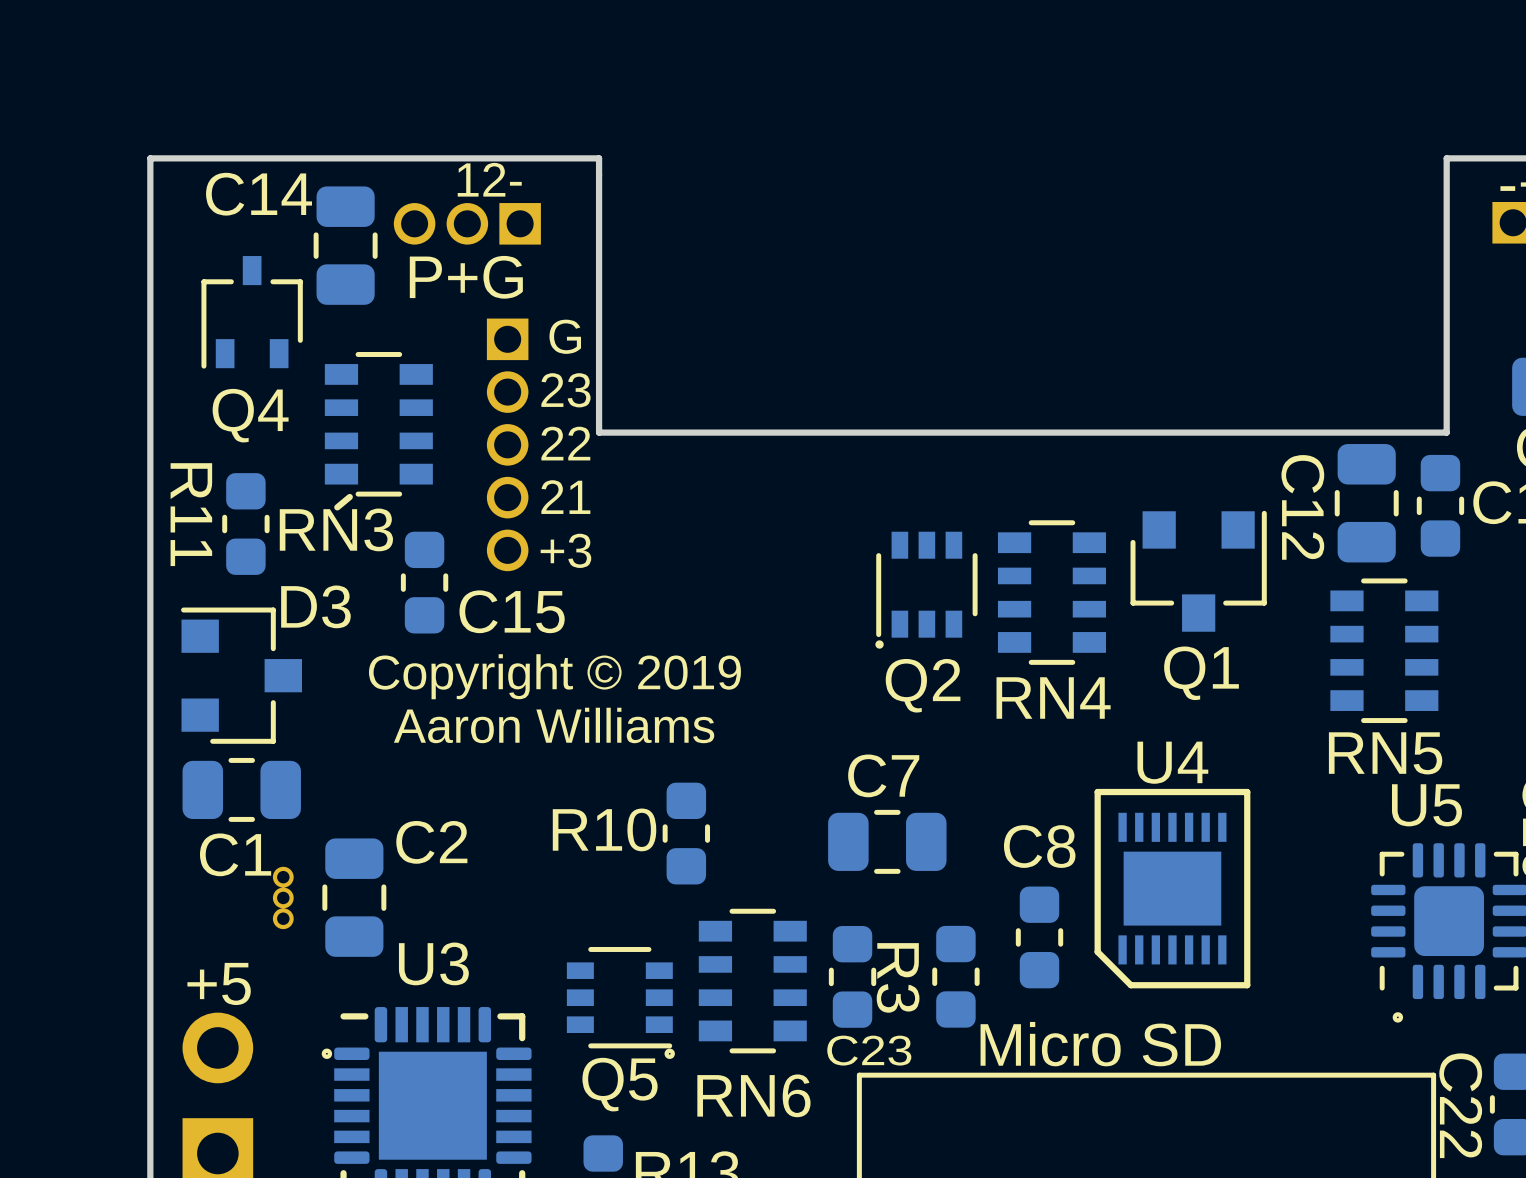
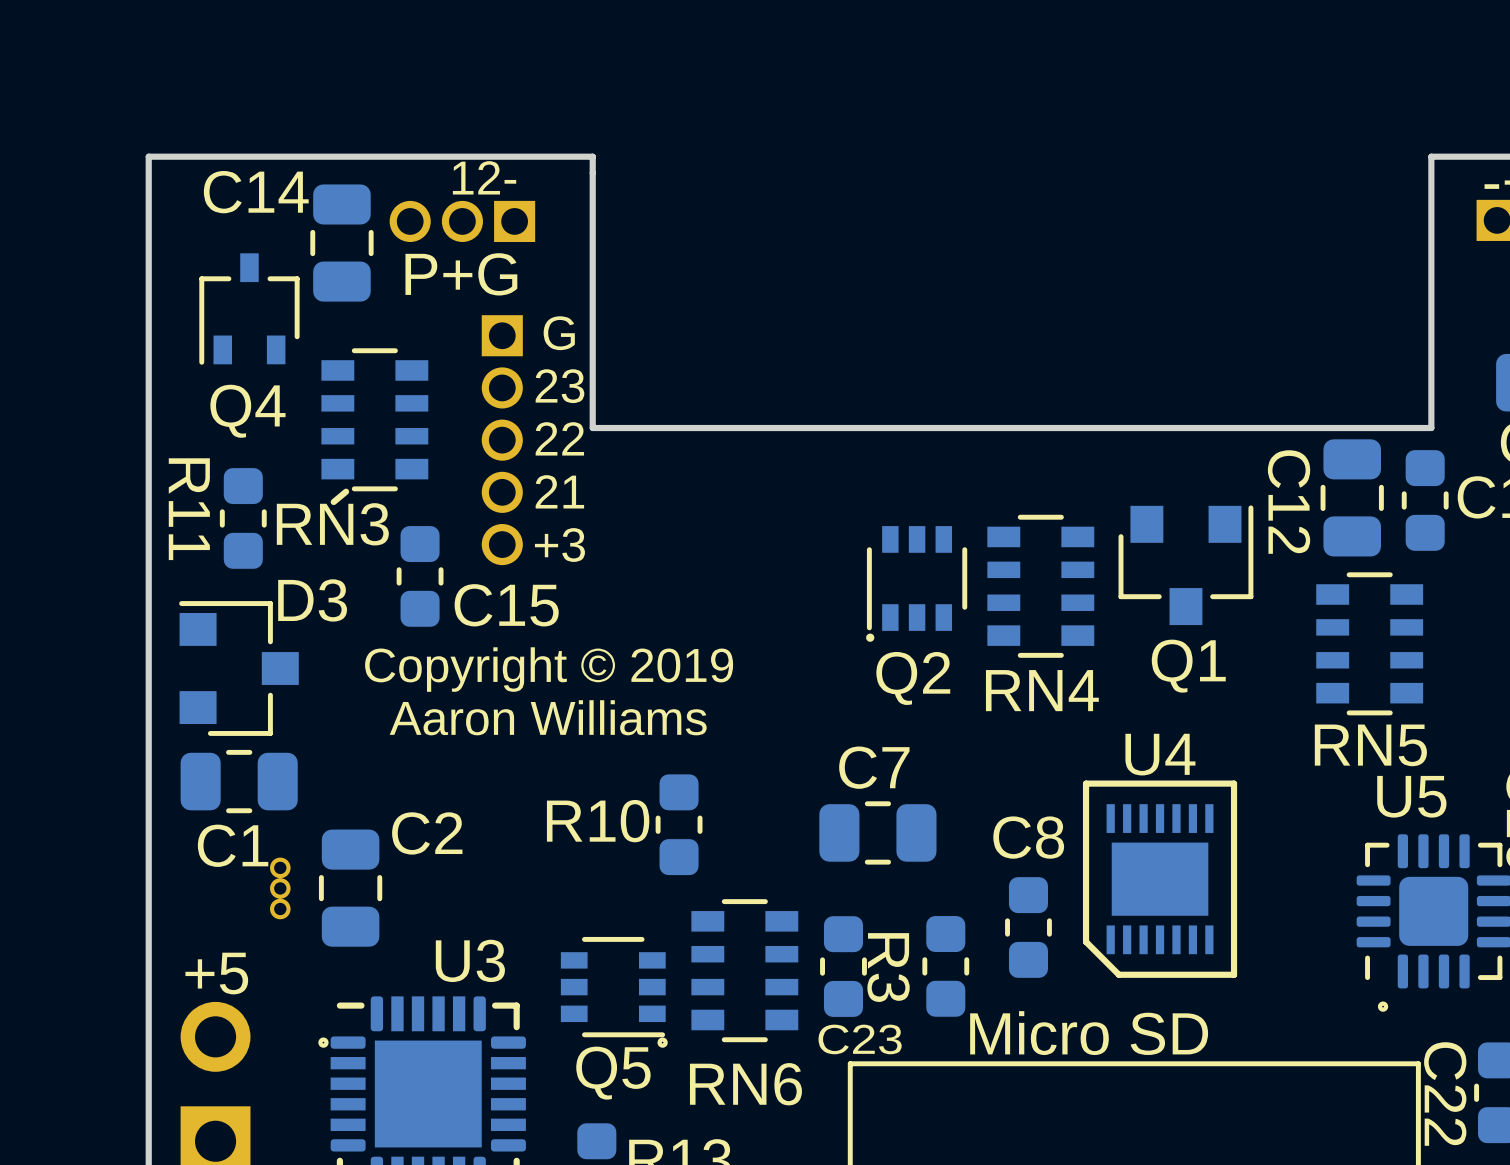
U3 name position: U3 (433, 963) -> U3 (470, 960)

